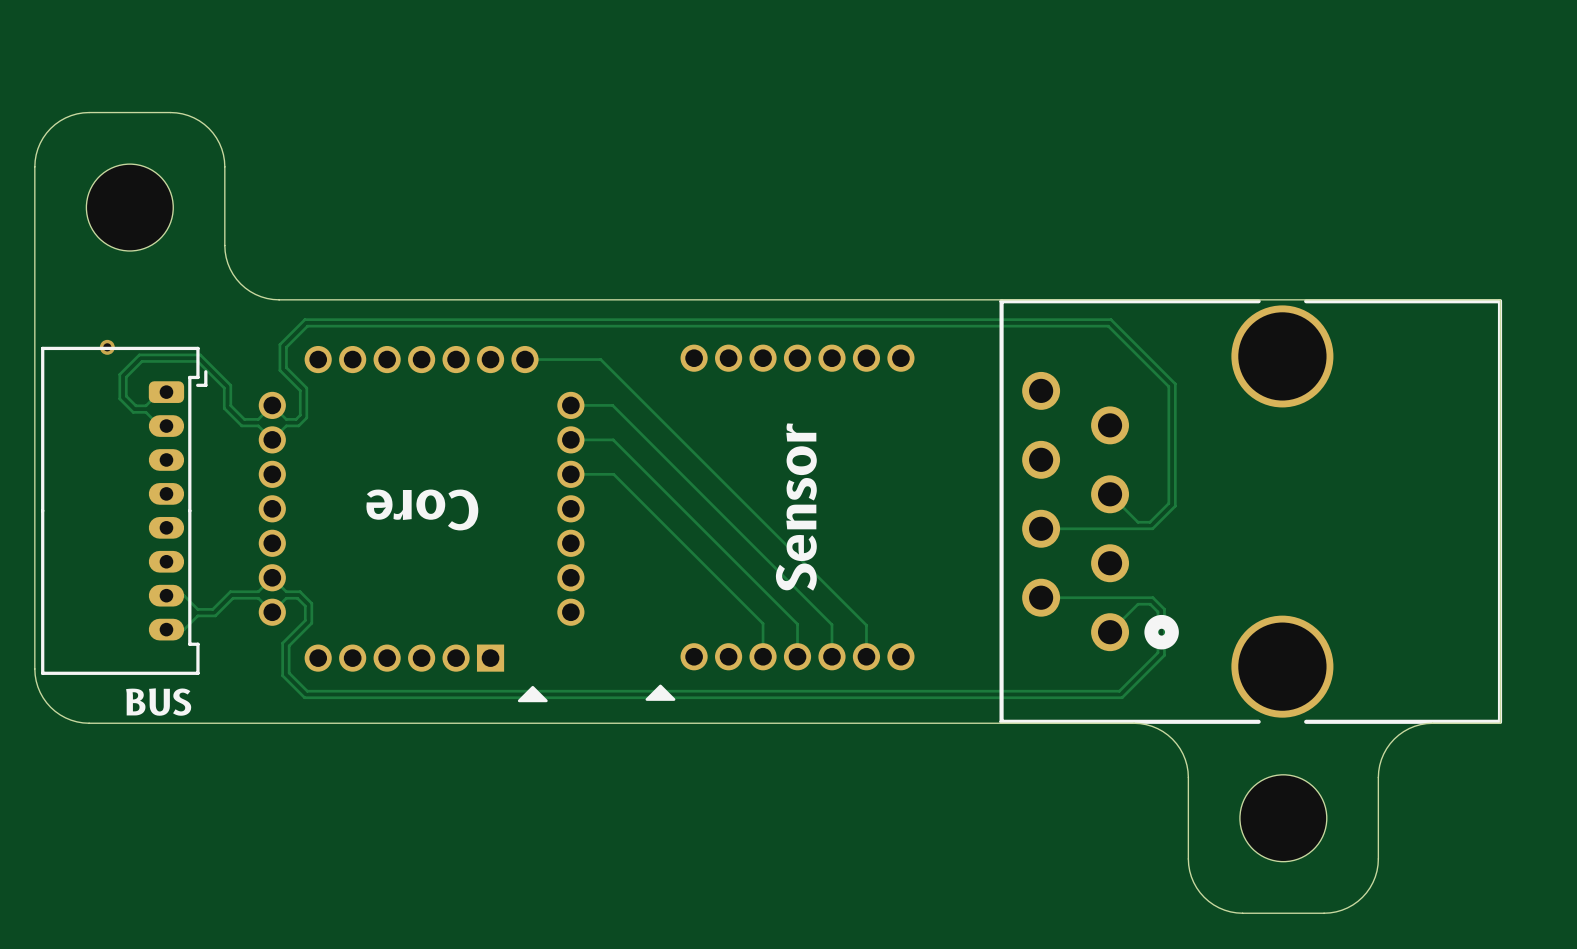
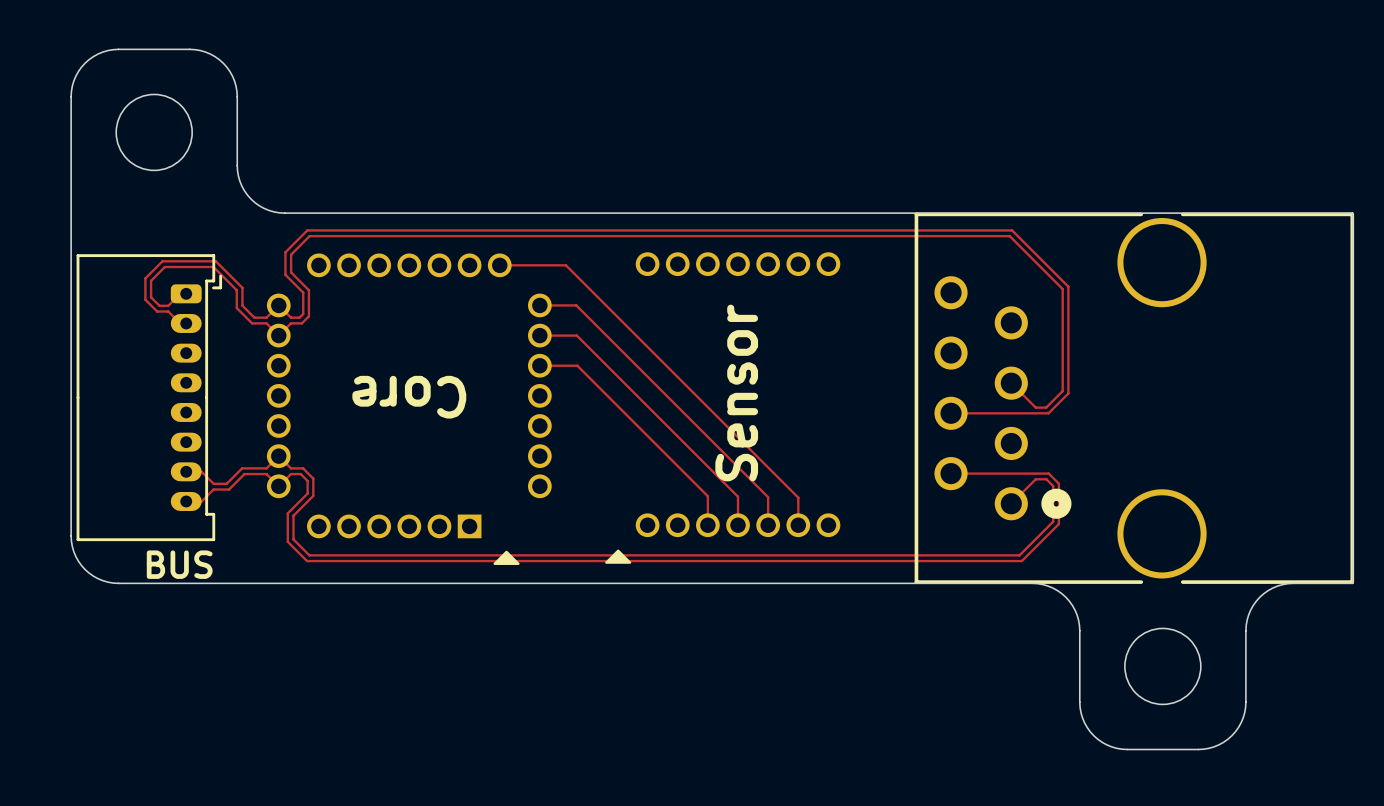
via: (107, 347) -> none

